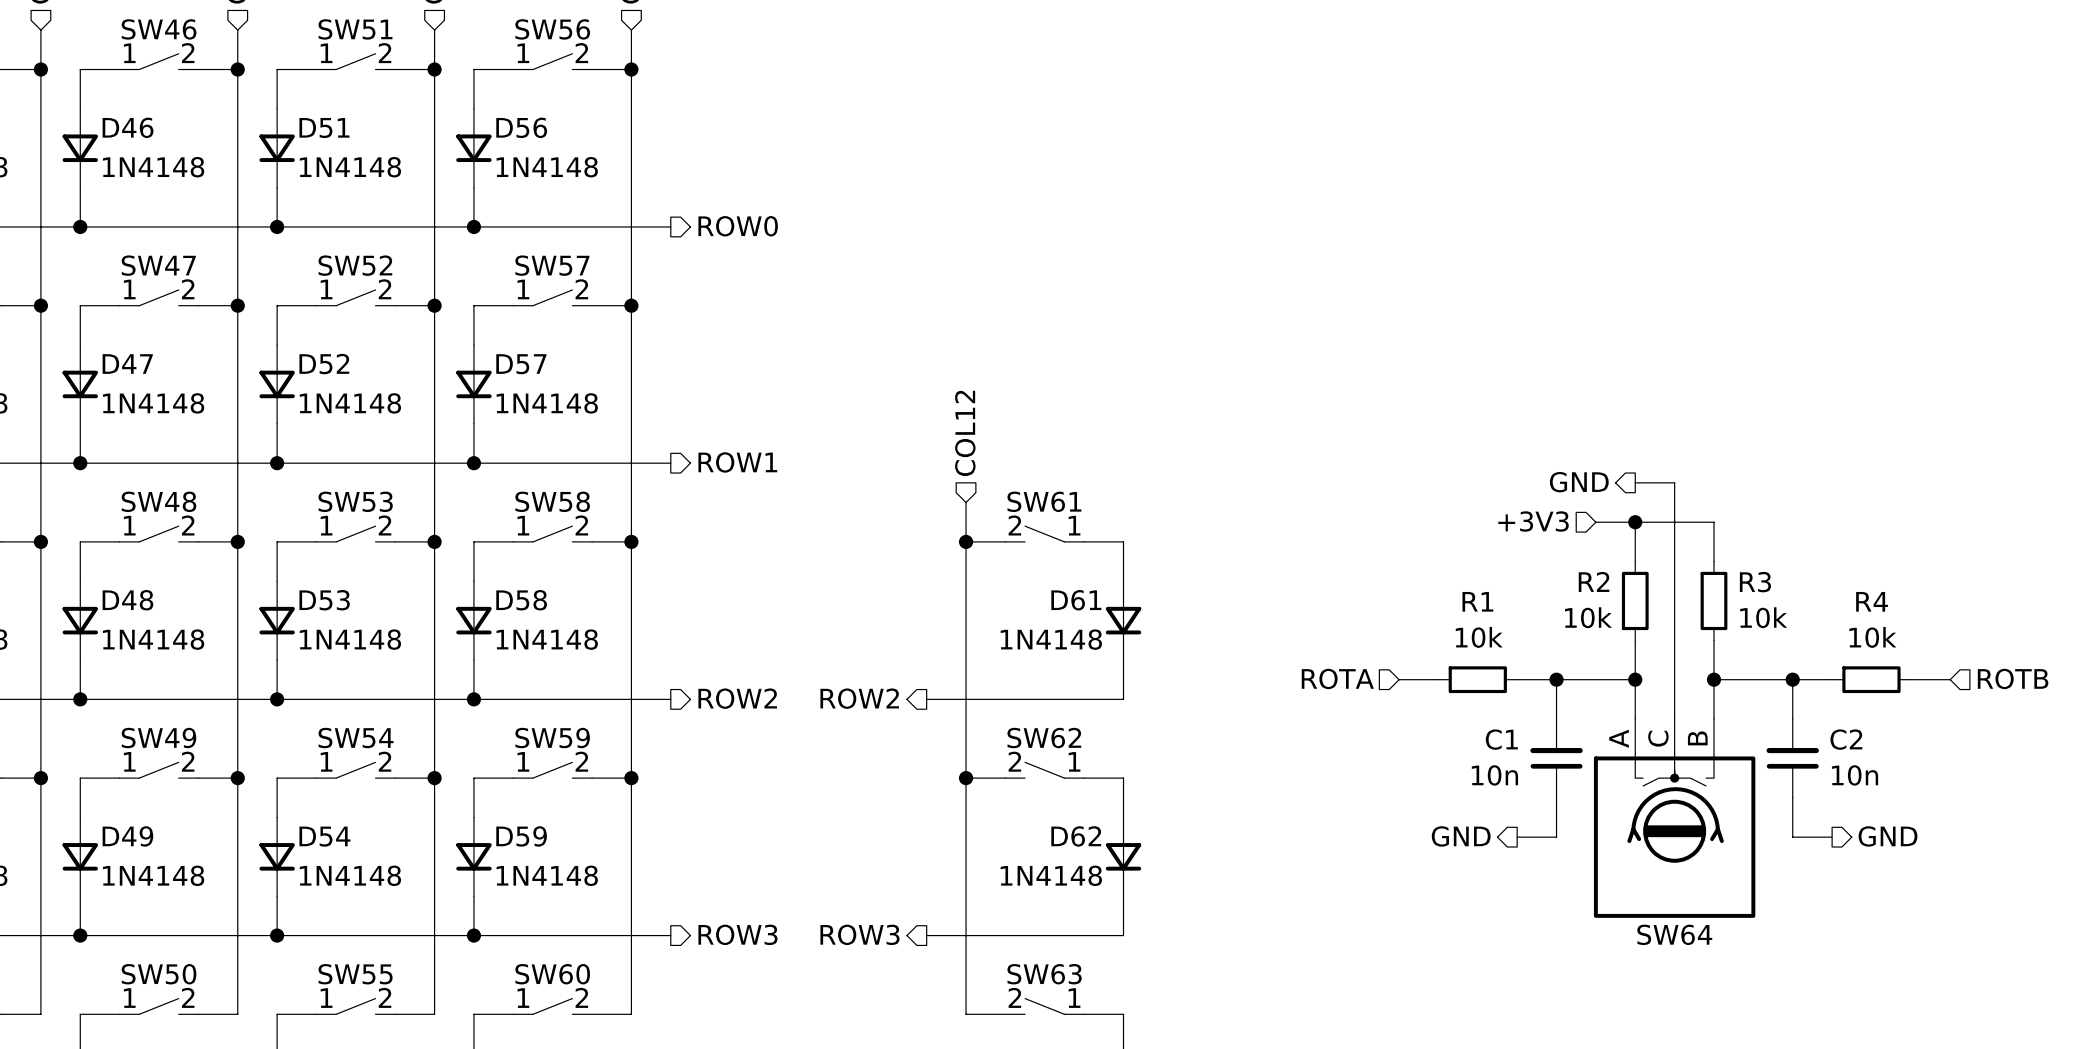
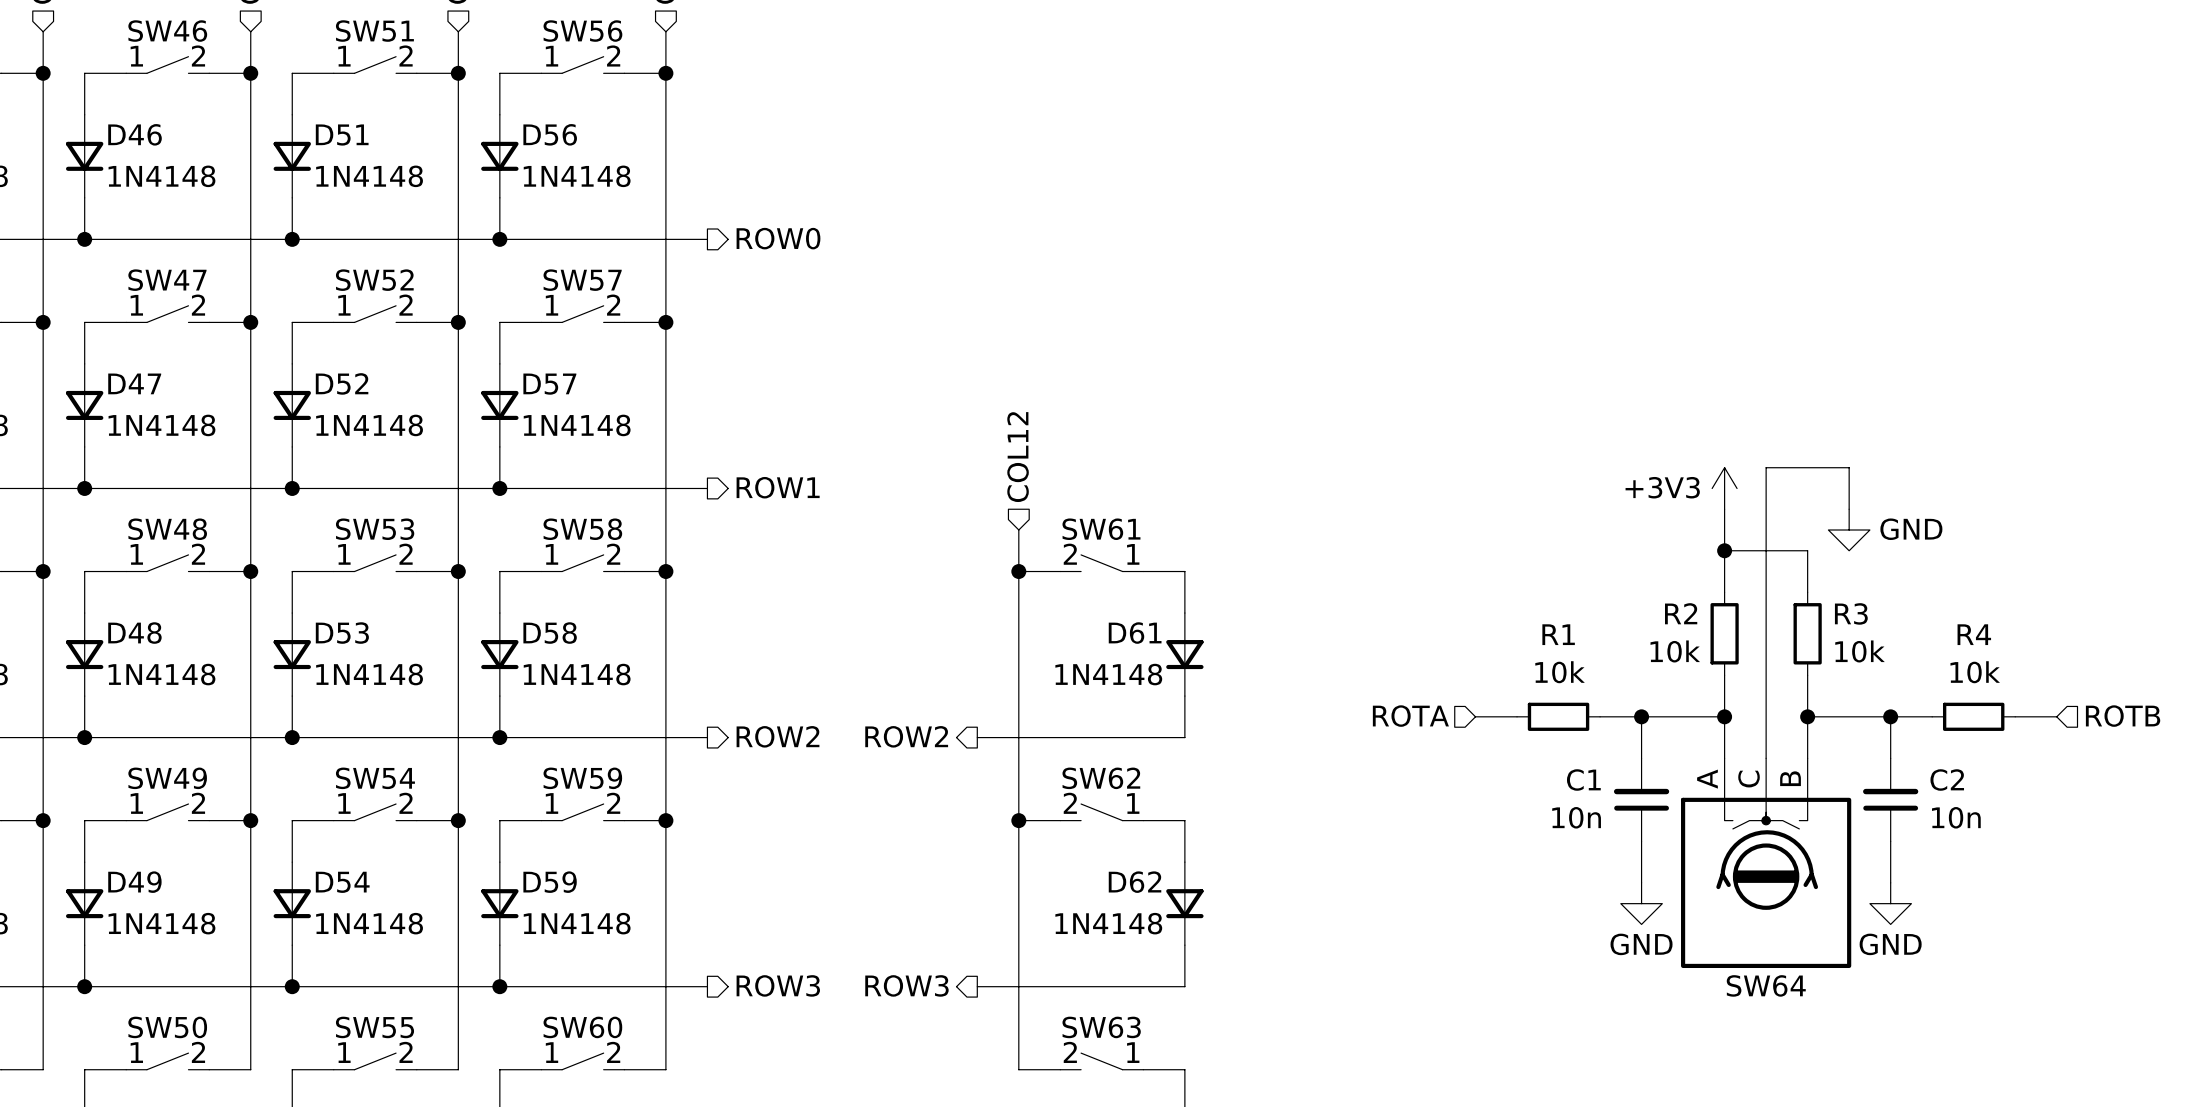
power symbol: none -> +3V3 (1724, 488)
hierarchical label: GND (1579, 482) -> none
wire: (1635, 482) (1674, 482) -> (1849, 509) (1849, 467) (1766, 467) (1766, 509)
power symbol: none -> GND (1849, 530)
hierarchical label: +3V3 (1533, 521) -> none
wire: (1595, 522) (1635, 522) -> (1724, 509) (1724, 550)
hierarchical label: GND (1461, 836) -> none
hierarchical label: GND (1888, 836) -> none
wire: (1517, 837) (1556, 837) -> none
wire: (1792, 837) (1832, 837) -> none
power symbol: none -> GND (1641, 903)
power symbol: none -> GND (1890, 903)

